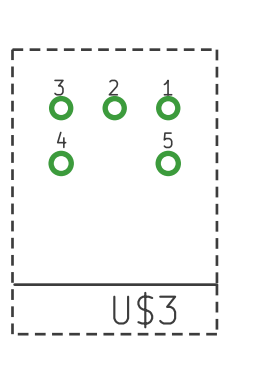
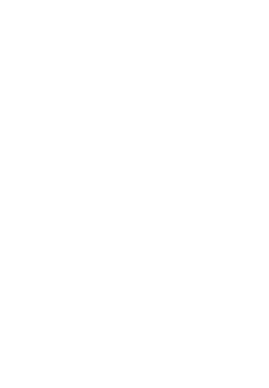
U$3: (114, 191) -> none

